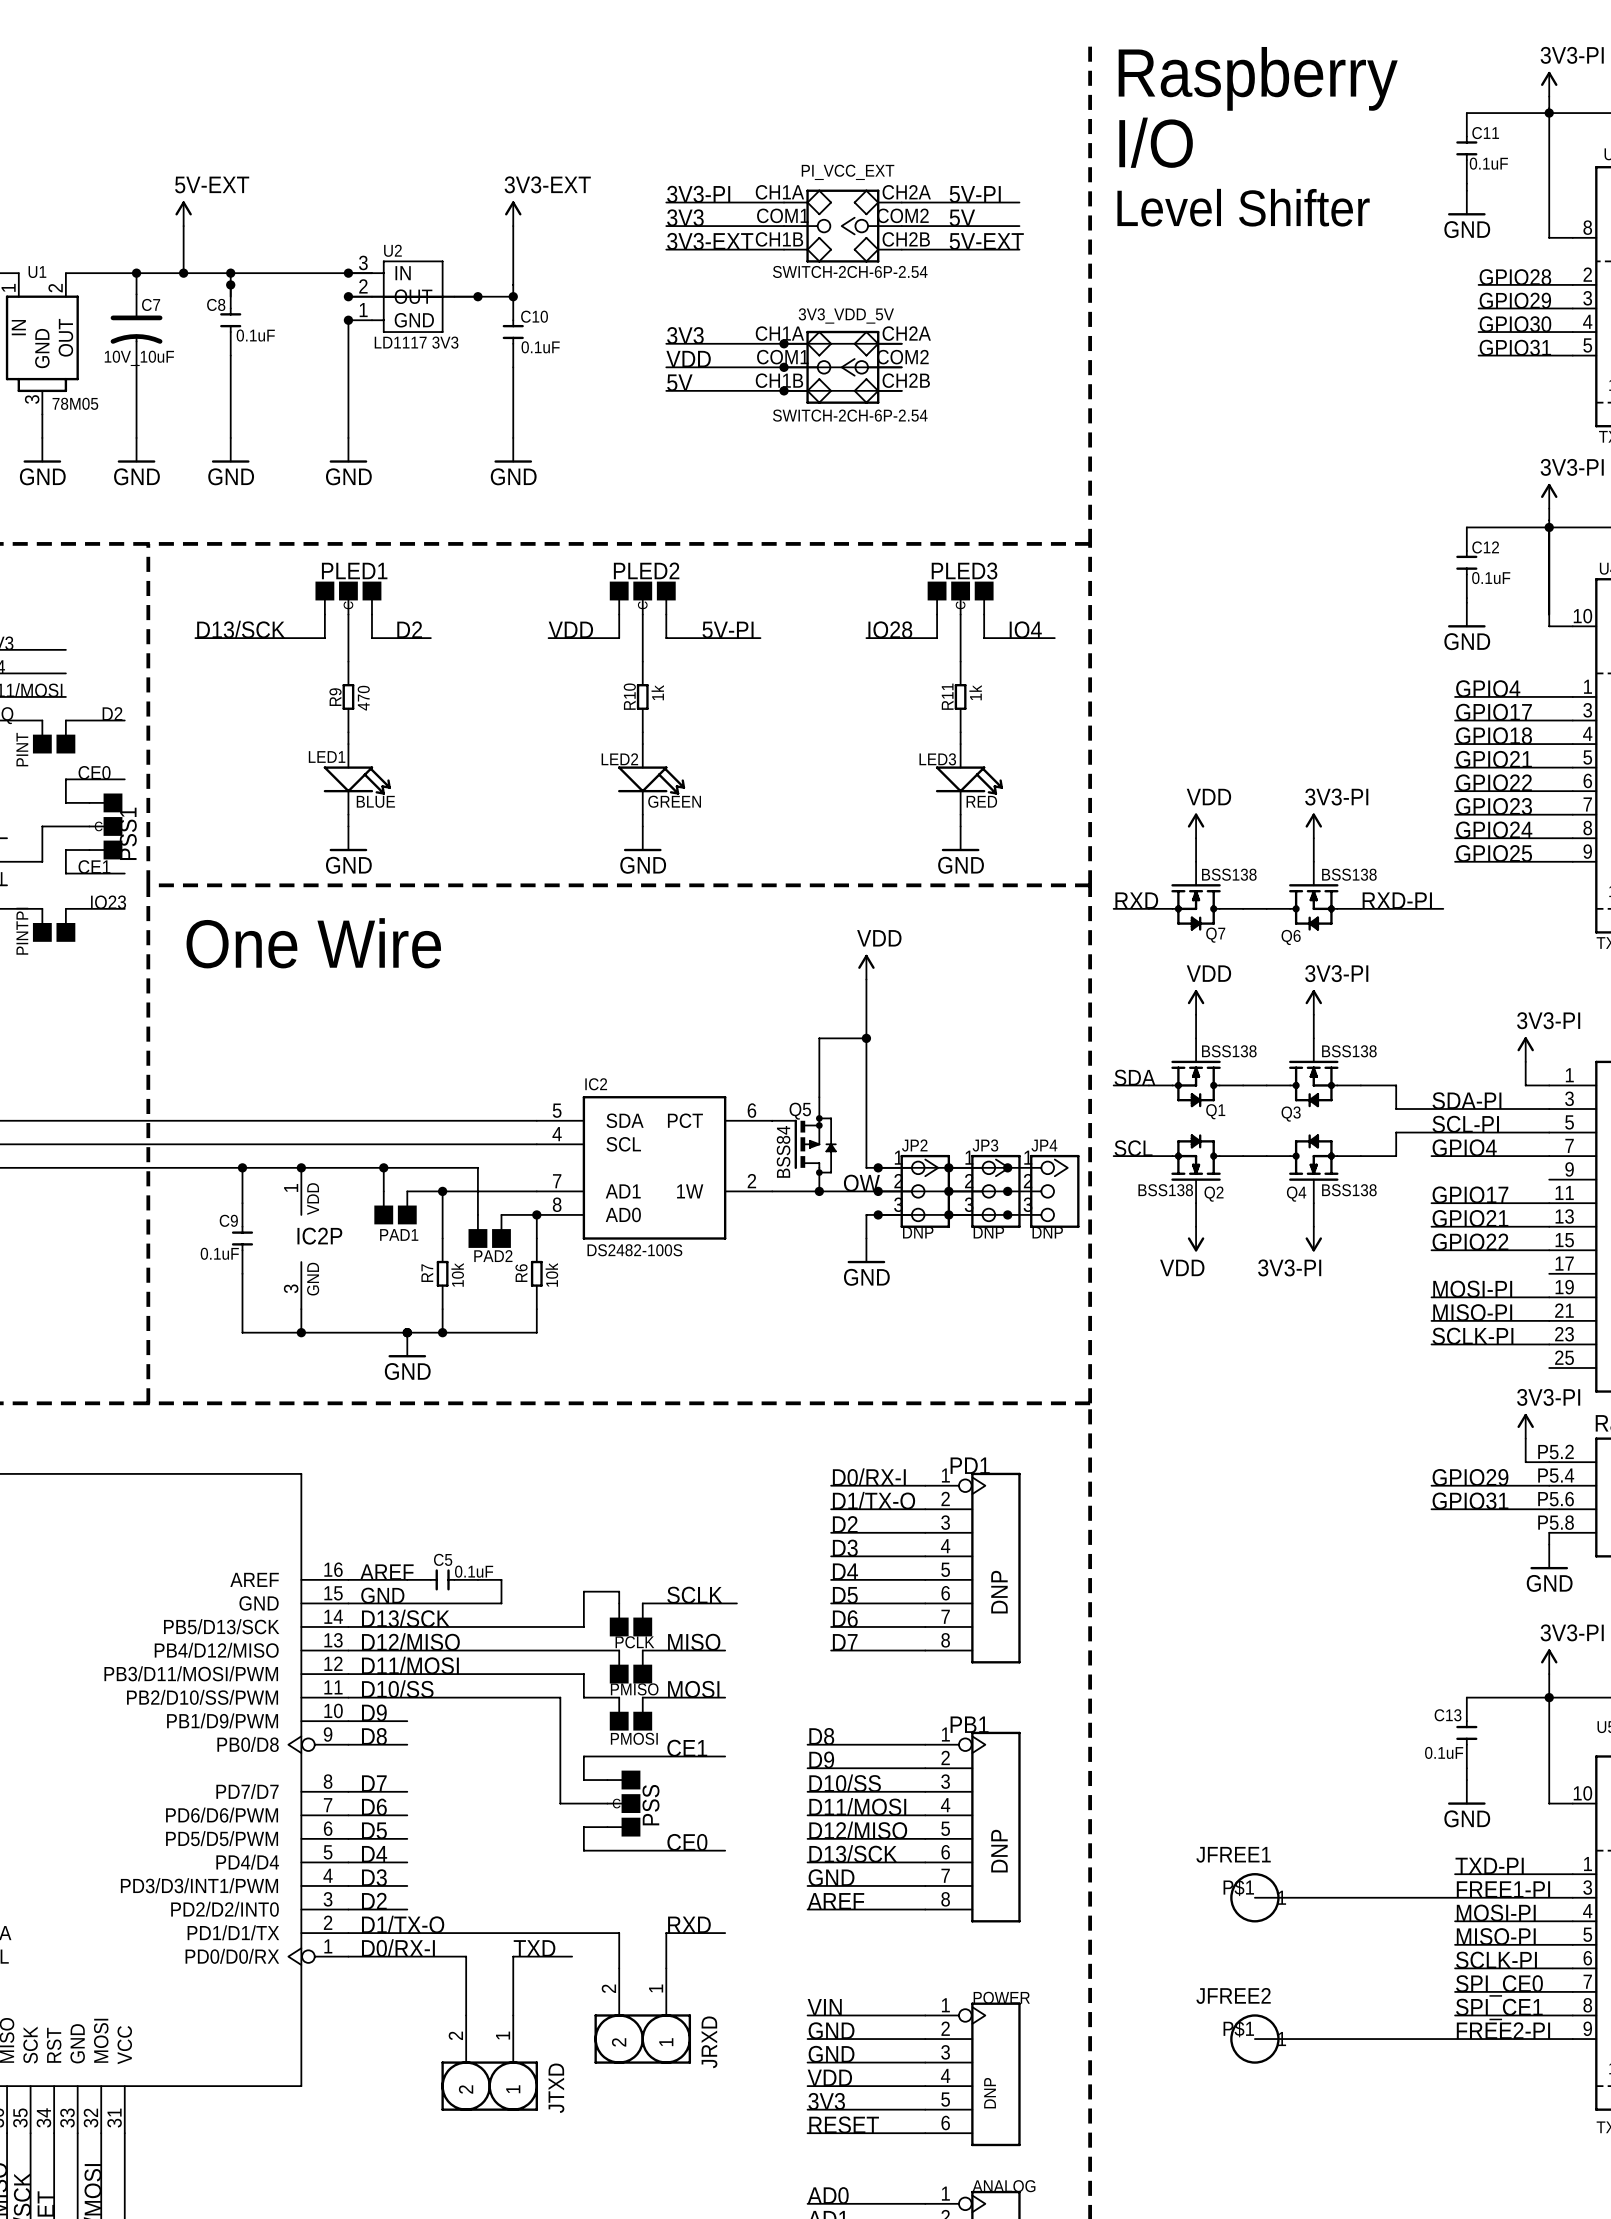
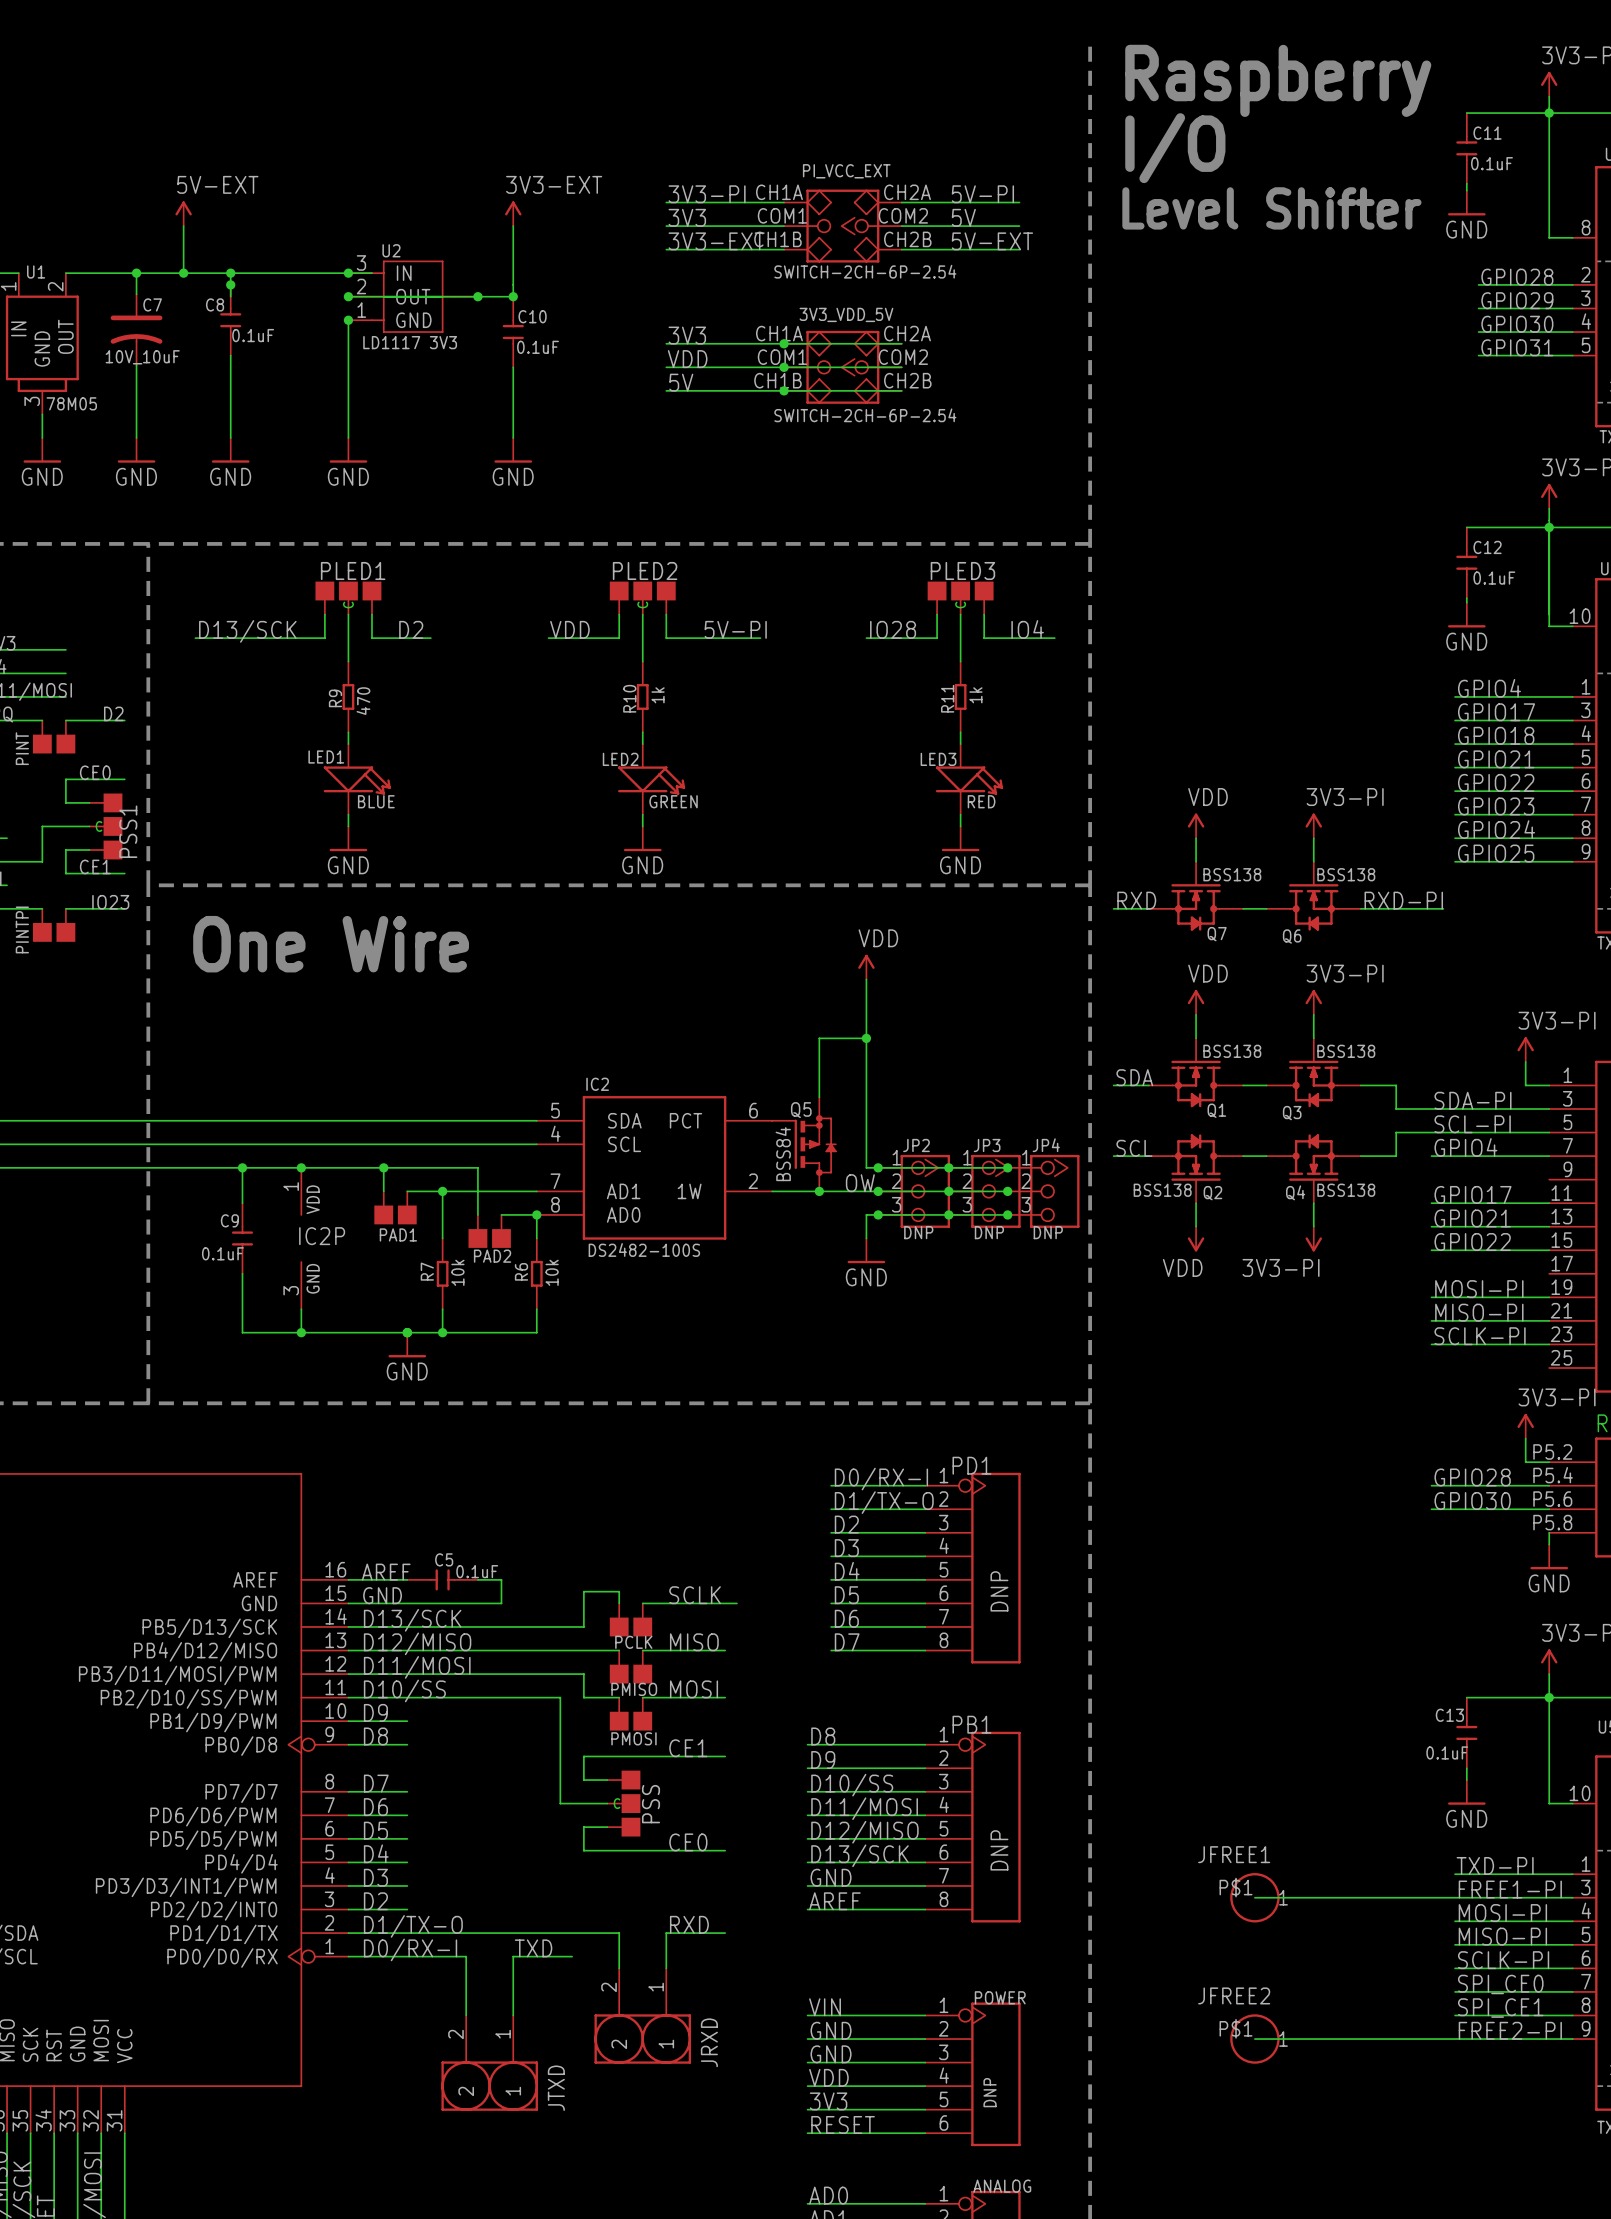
label: GPIO29 (1470, 1477) -> GPIO28 (1472, 1477)
label: GPIO31 (1470, 1501) -> GPIO30 (1472, 1501)

